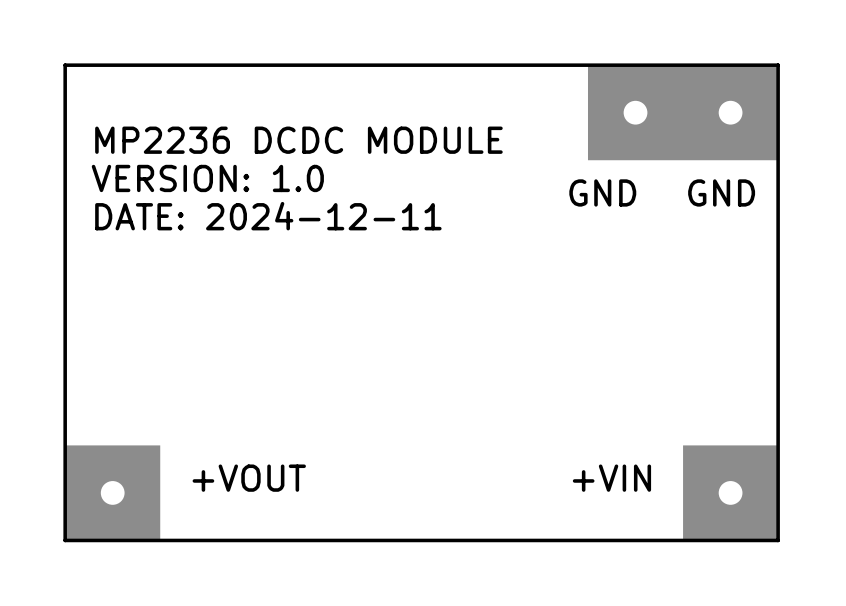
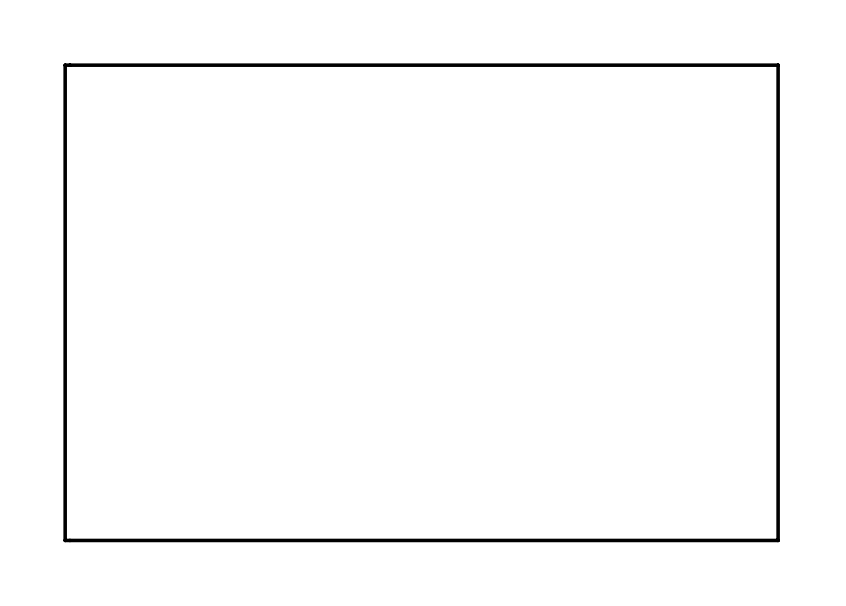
part: (635, 112) -> none
part: (730, 112) -> none
text: MP2236 DCDC MODULE (298, 140) -> none
text: VERSION: 1.0 (207, 178) -> none
text: GND (602, 192) -> none
text: GND (721, 192) -> none
text: DATE: 2024-12-11 (268, 216) -> none
text: +VOUT (249, 478) -> none
text: +VIN (611, 478) -> none
part: (112, 492) -> none
part: (730, 492) -> none

